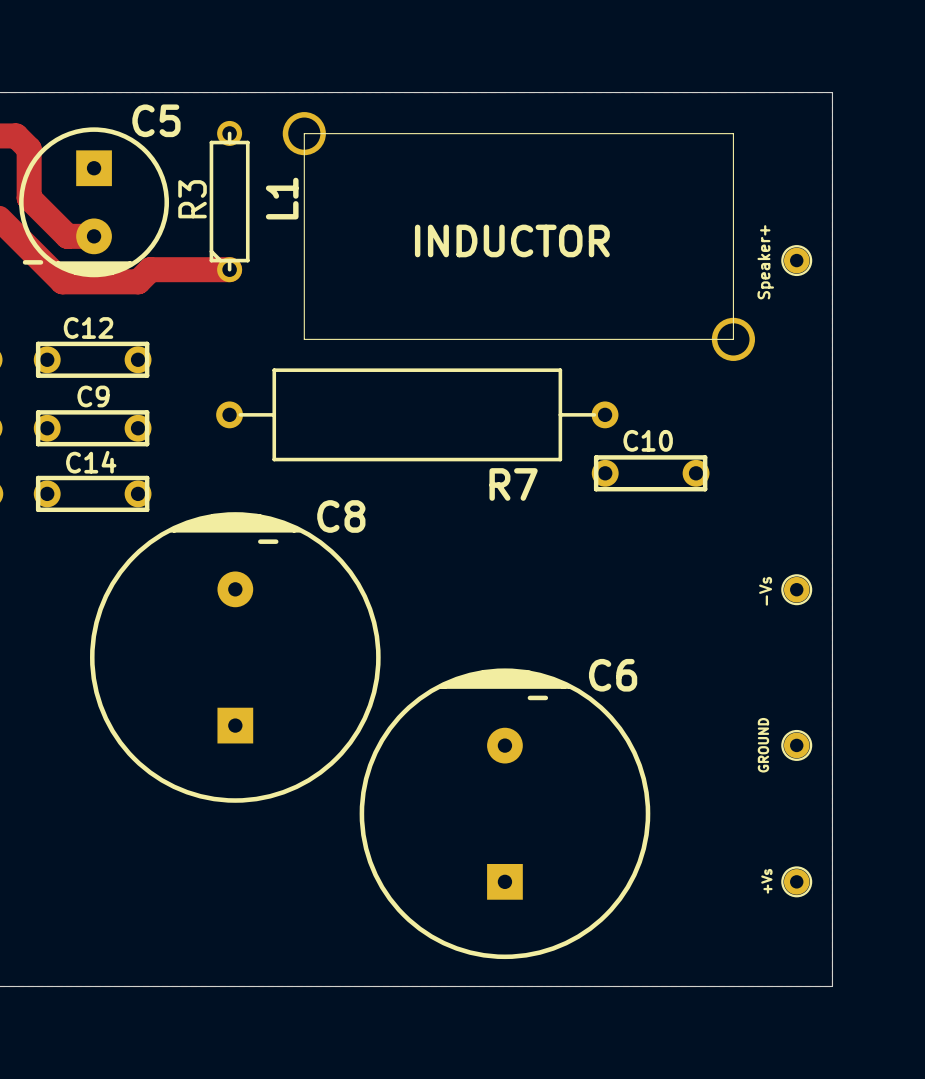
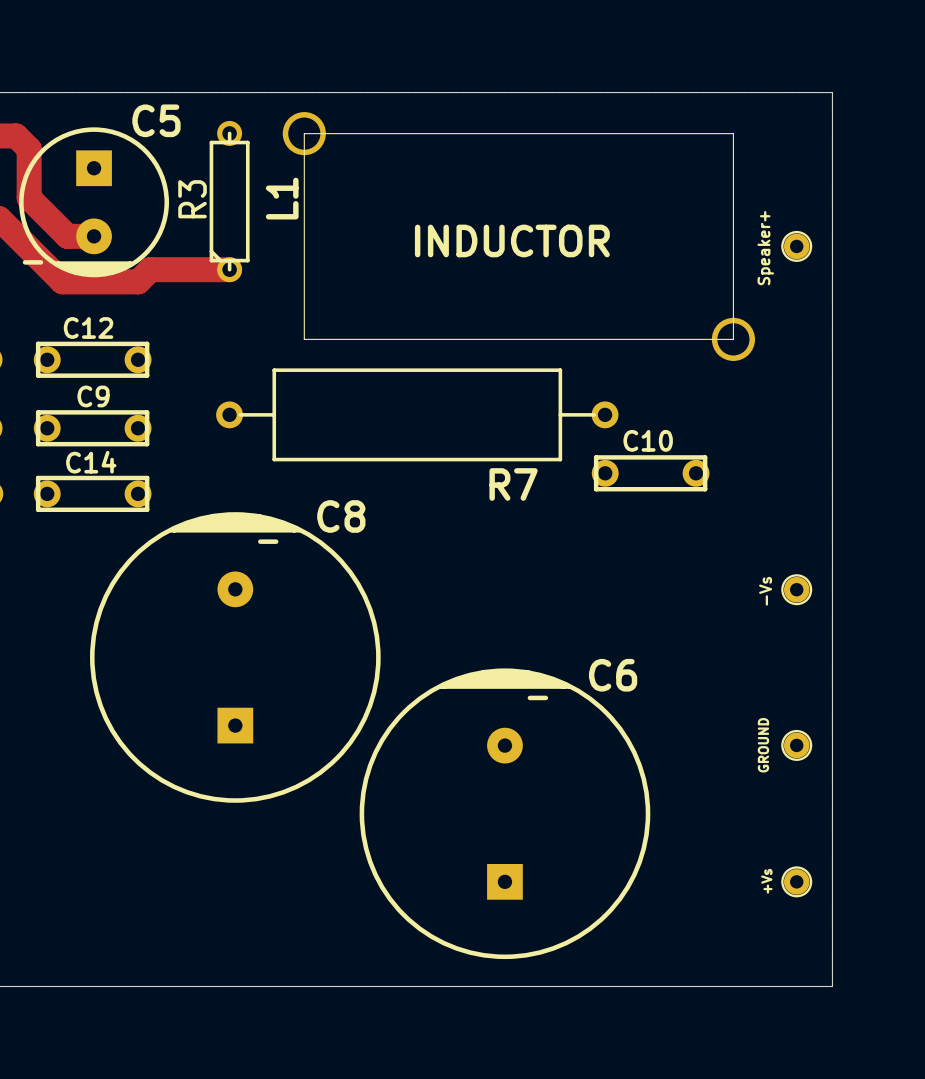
Speaker+ position: (796, 260) -> (796, 246)

